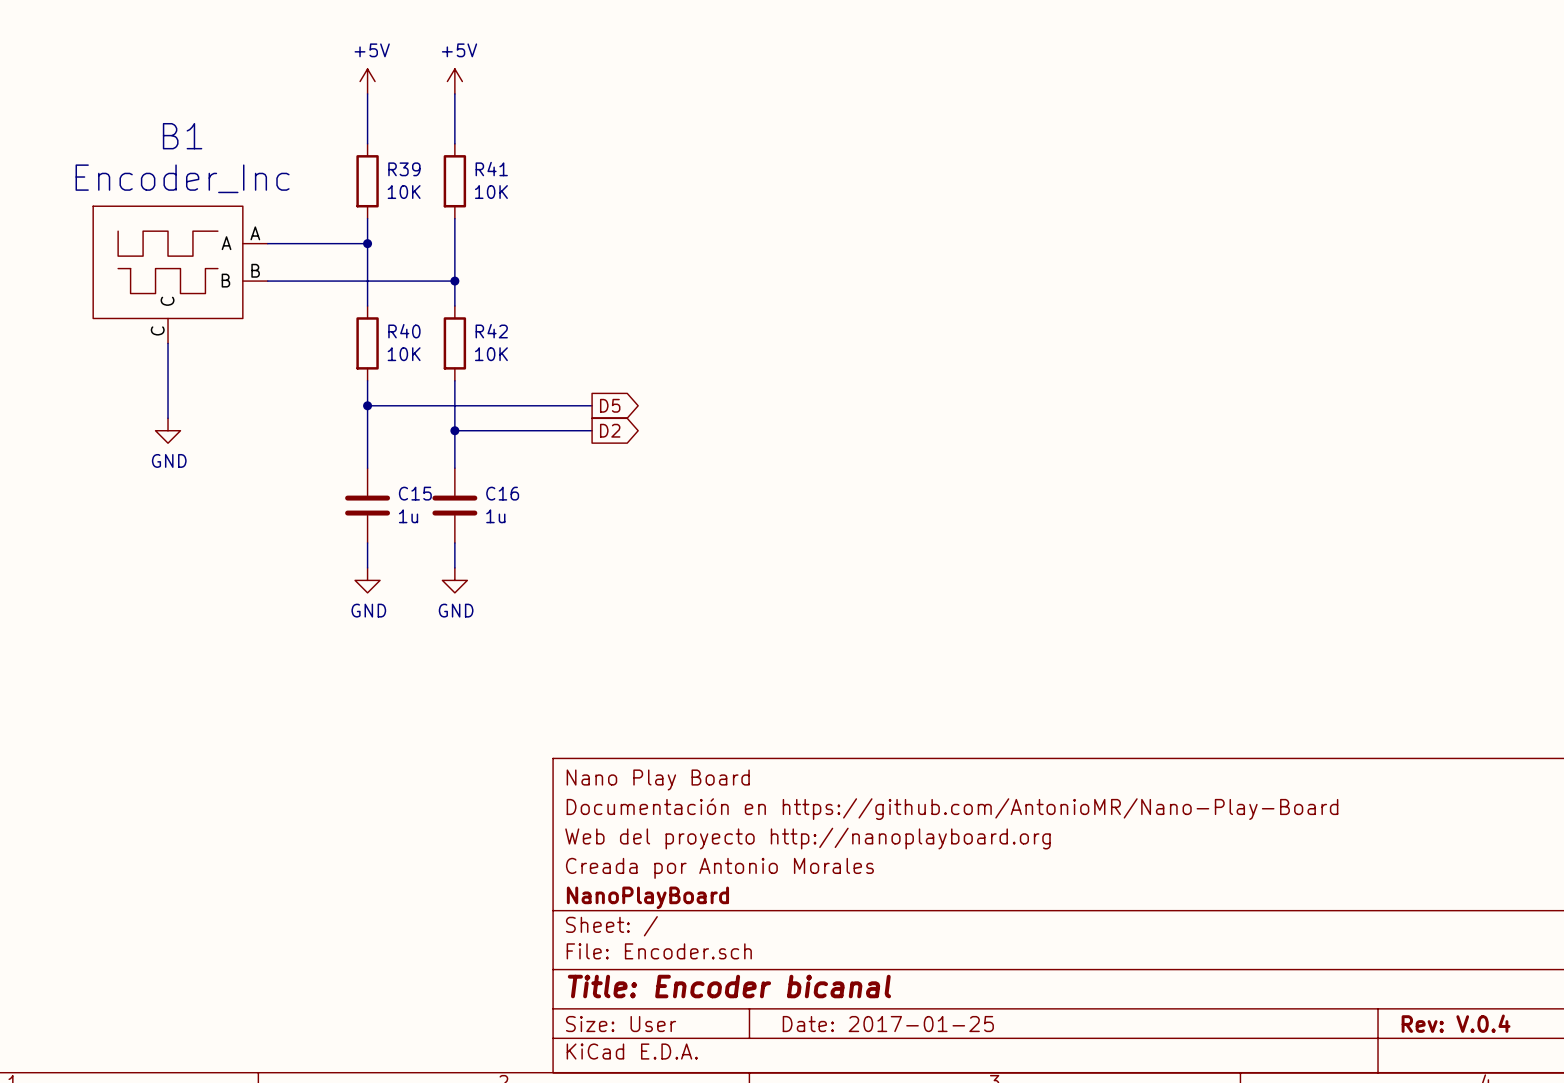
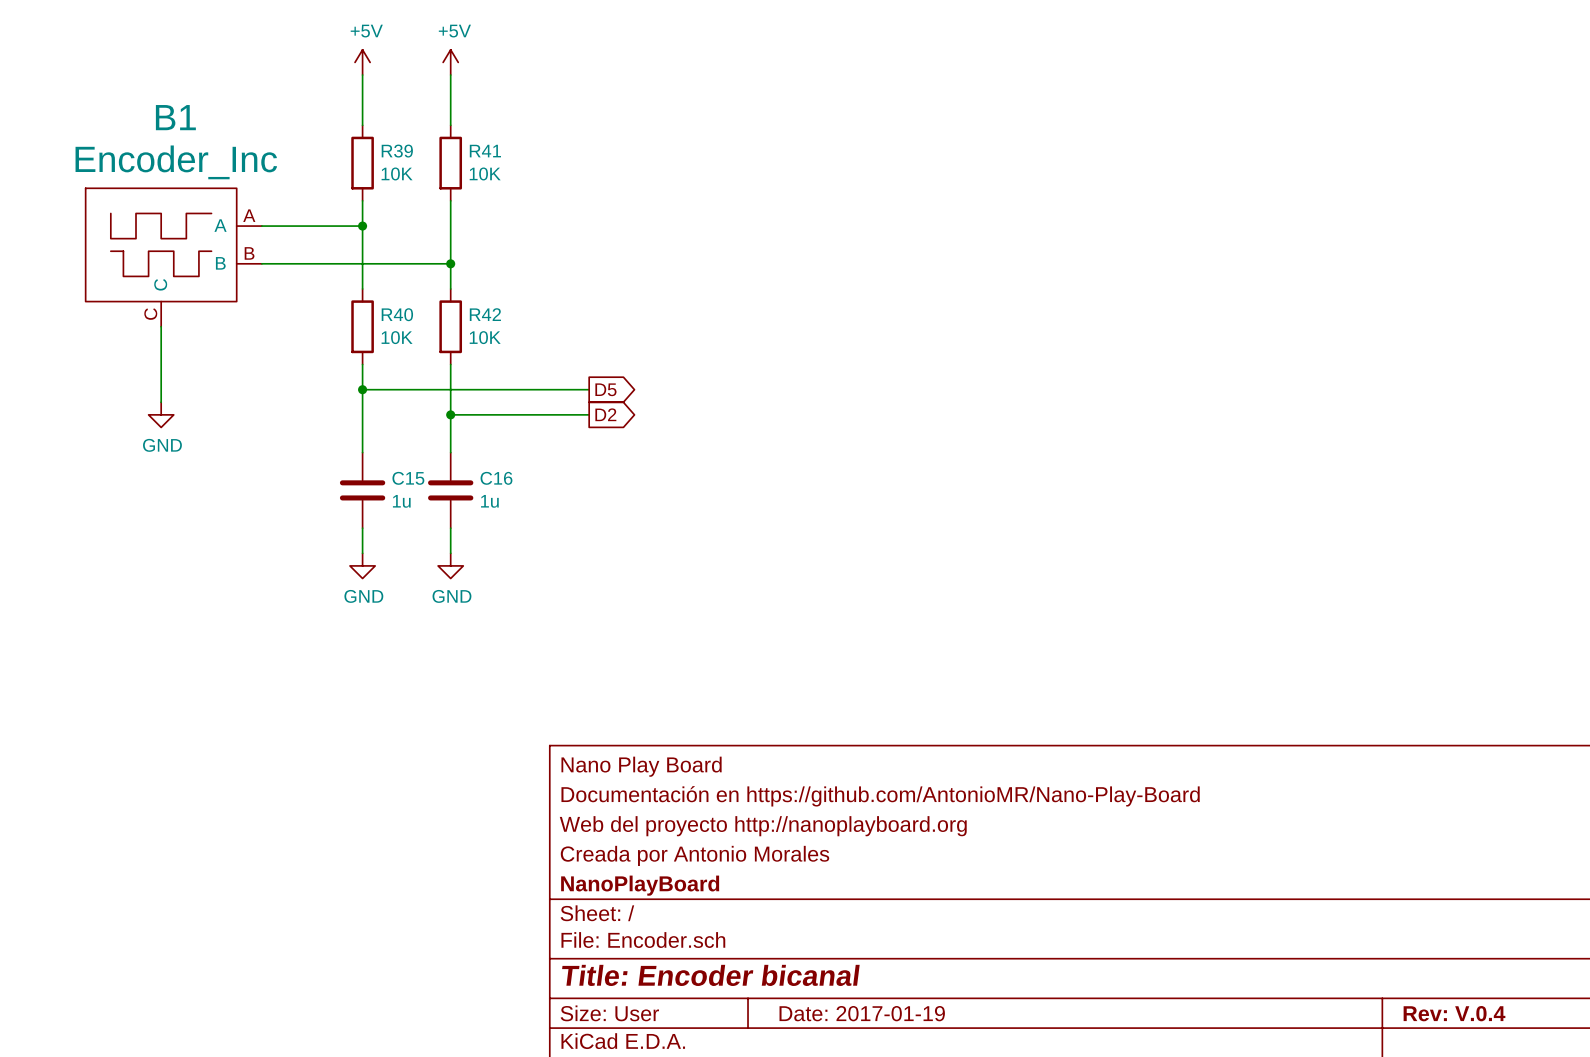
title block: Date: 2017-01-25 (888, 1024) -> Date: 2017-01-19 (862, 1013)

